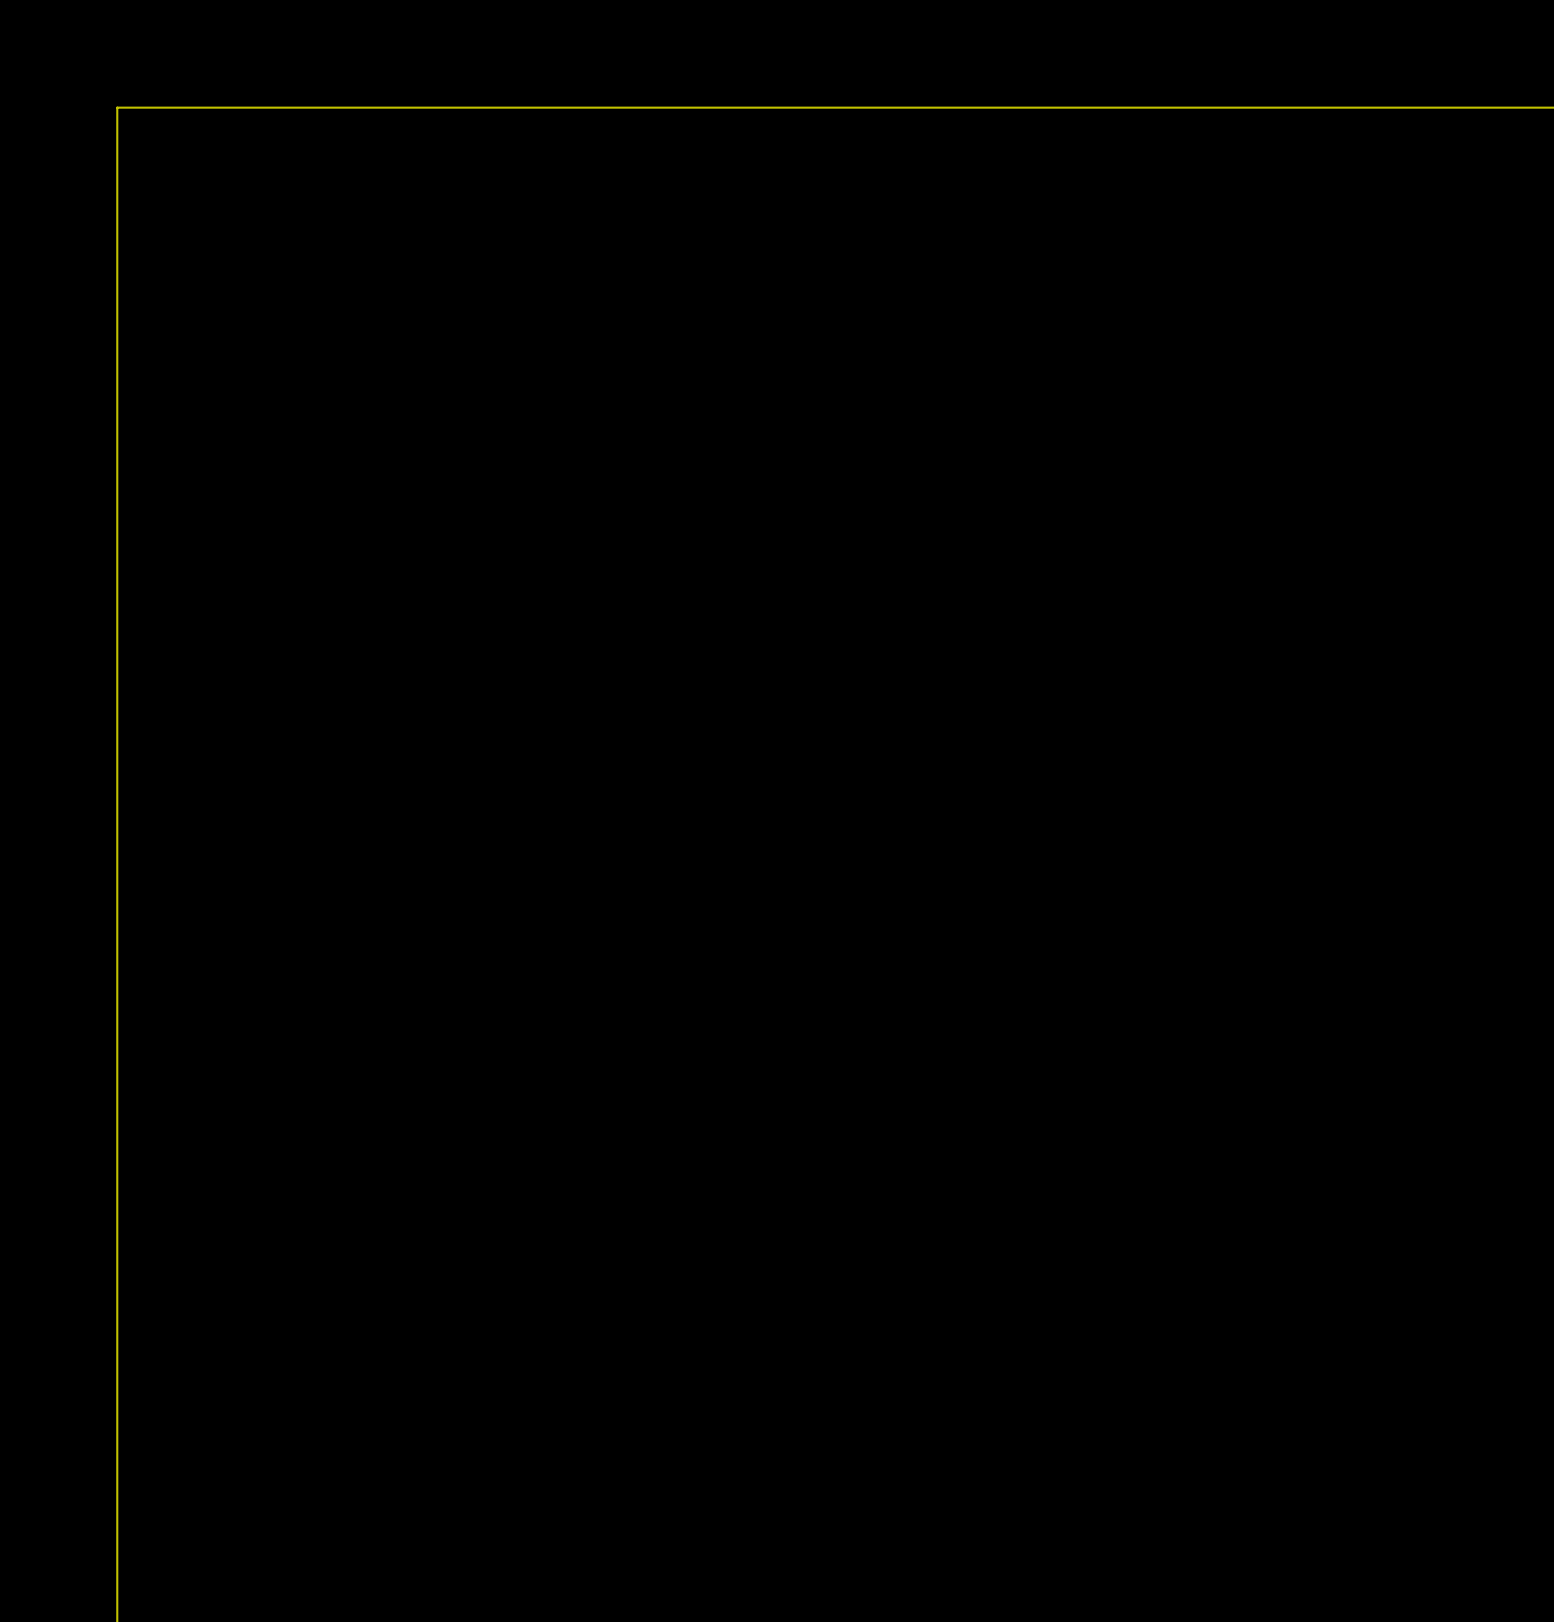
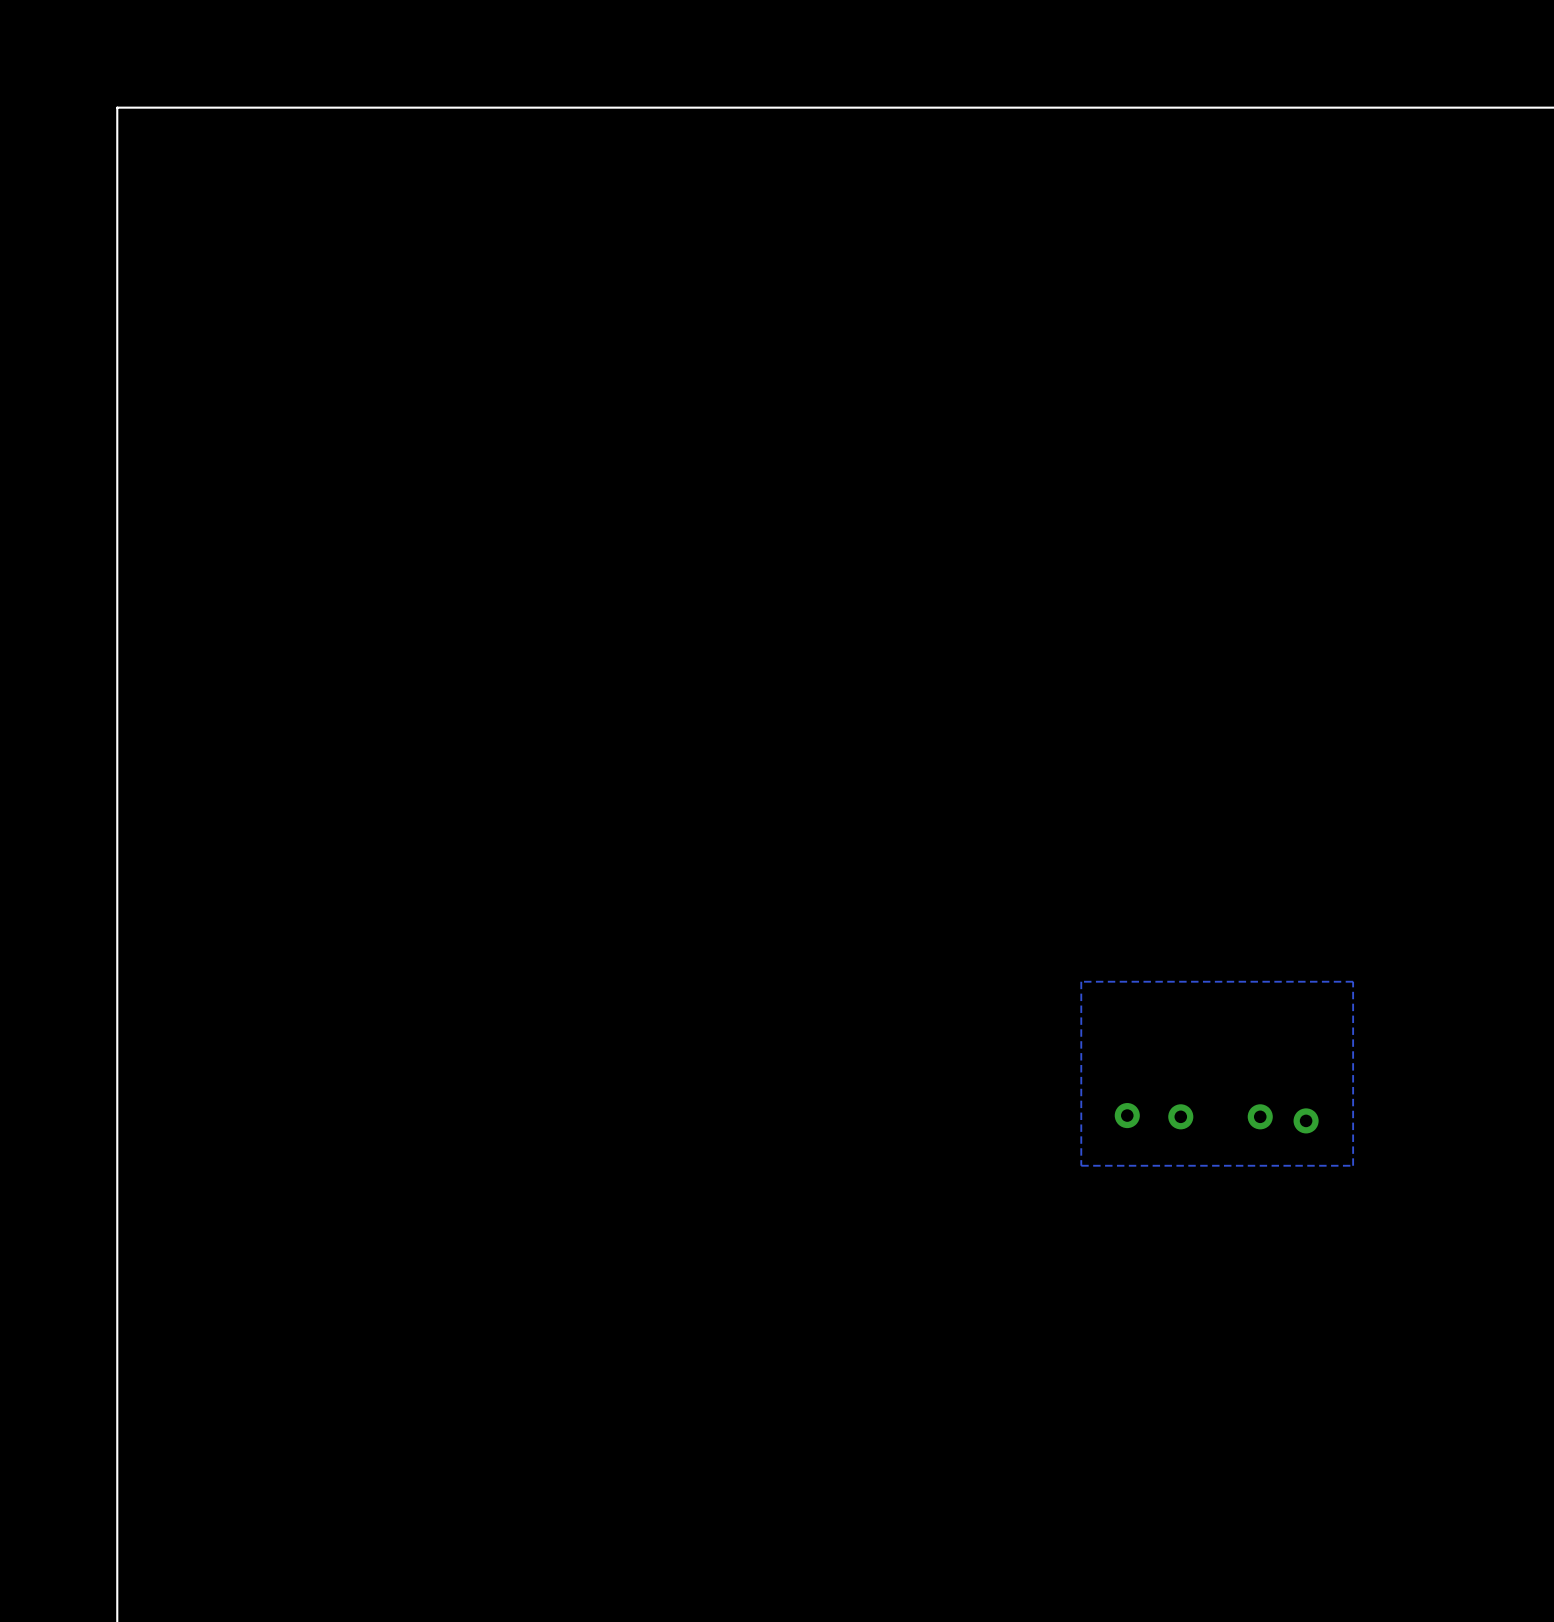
zone outline: none -> (1353, 981) (1081, 981) (1081, 1165) (1353, 1165) (1353, 981)
via: none -> (1127, 1115)
via: none -> (1180, 1116)
via: none -> (1260, 1116)
via: none -> (1306, 1120)

